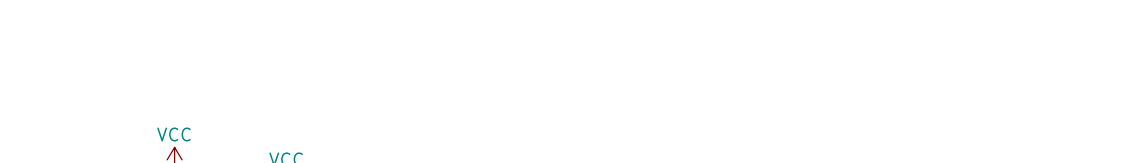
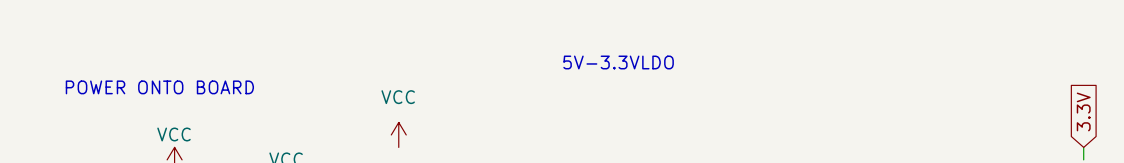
text: none -> 5V-3.3VLDO (618, 62)
text: none -> POWER ONTO BOARD (159, 87)
global label: none -> 3.3V (1083, 111)
power symbol: none -> VCC (398, 134)
wire: none -> (1083, 147) (1083, 159)

